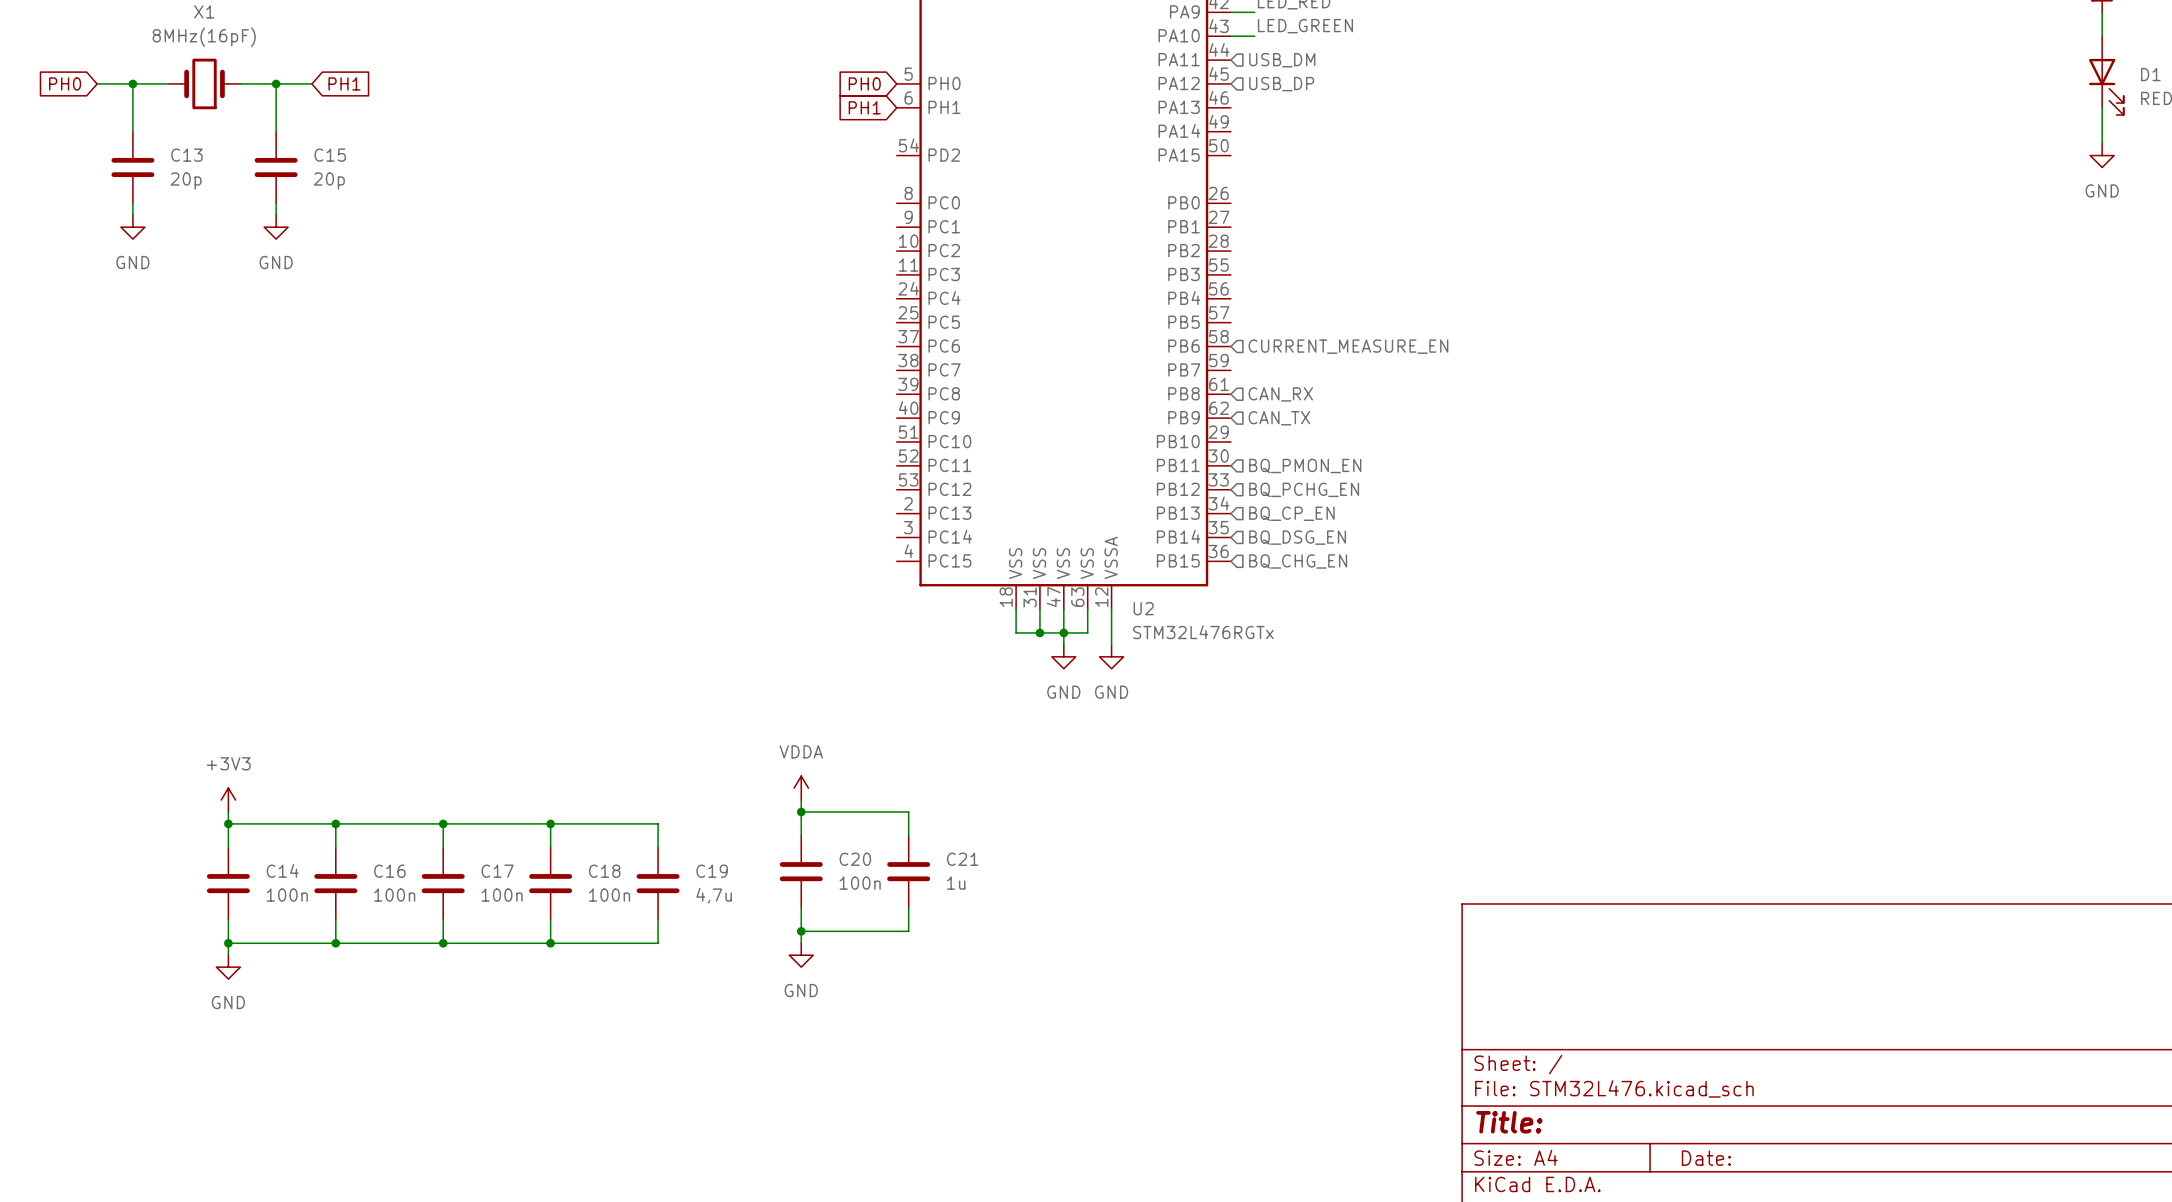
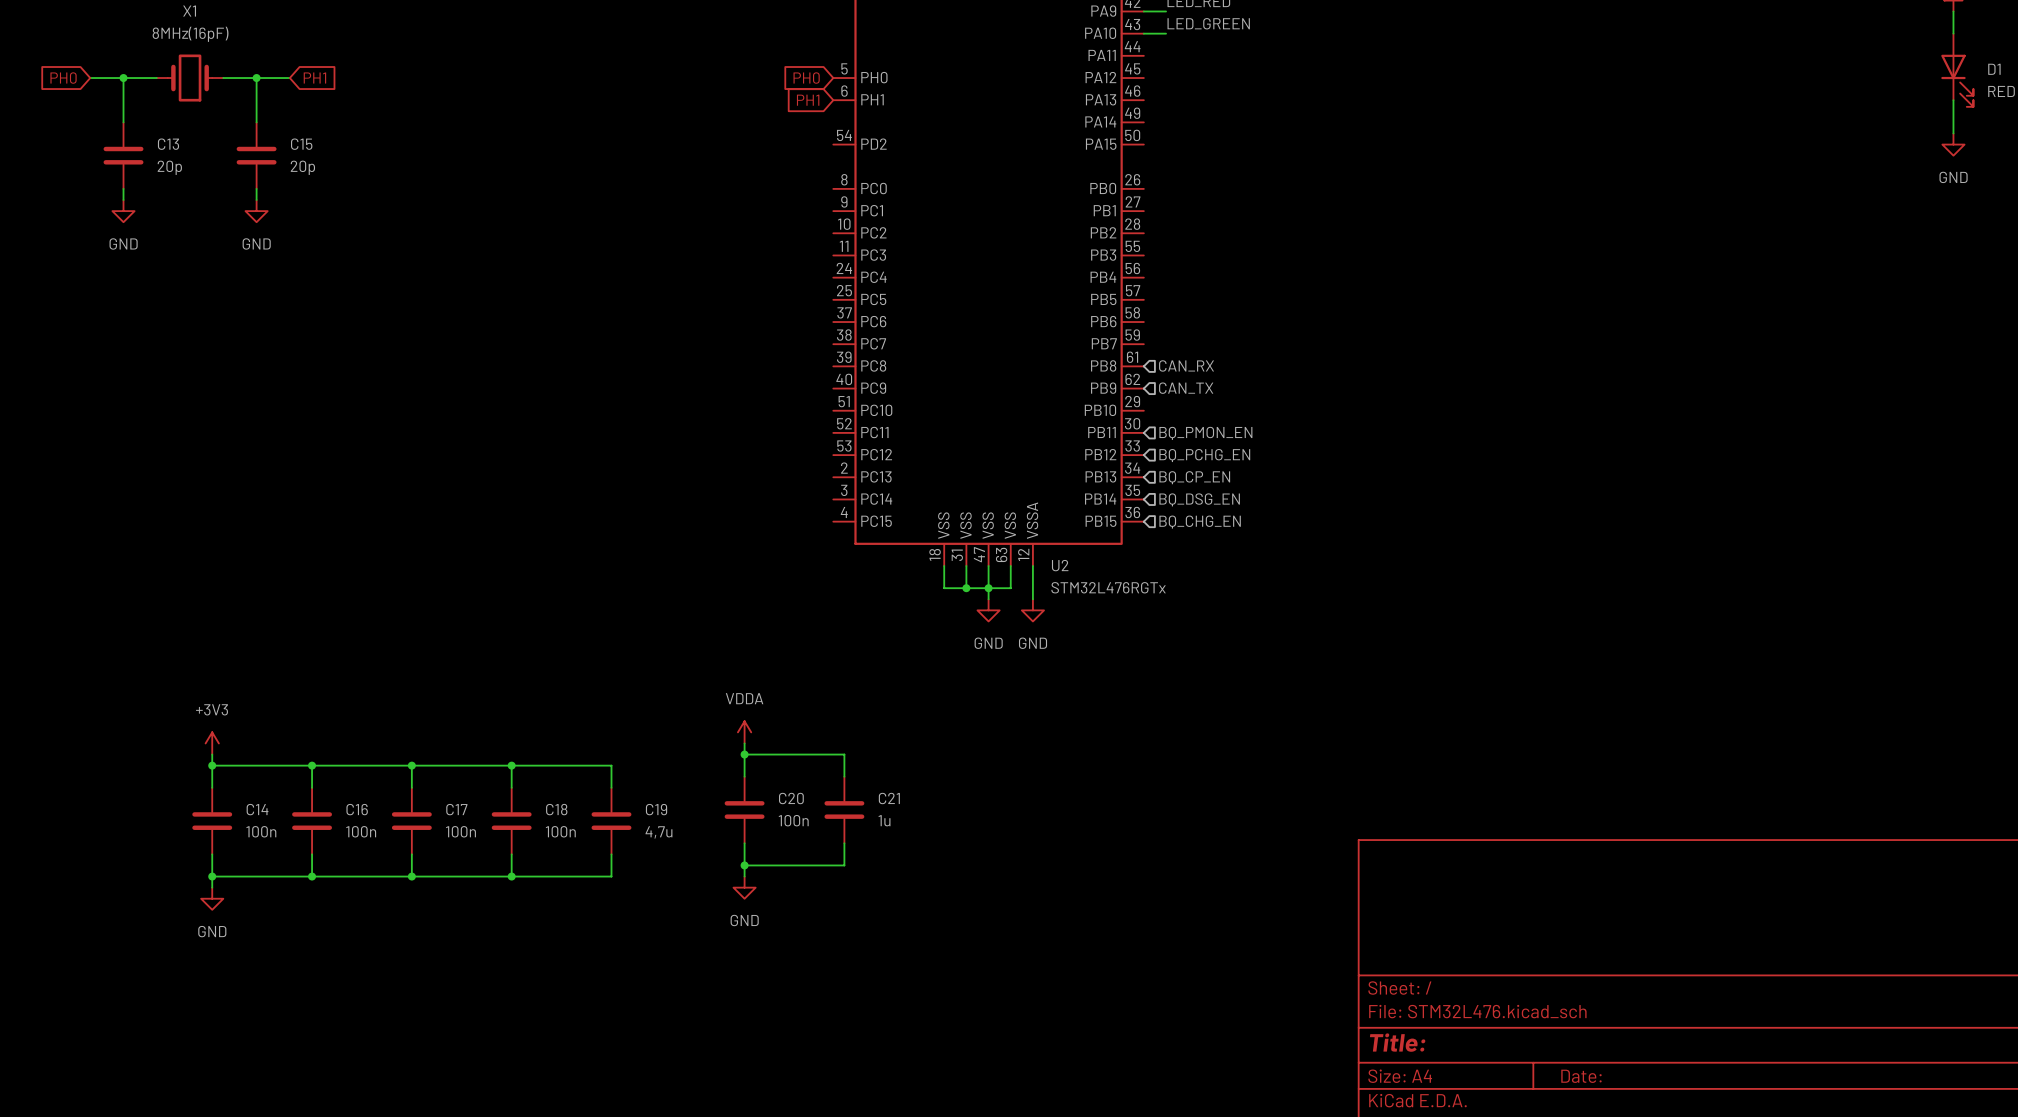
hierarchical label: USB_DM (1282, 60) -> none
hierarchical label: USB_DP (1281, 84) -> none
hierarchical label: CURRENT_MEASURE_EN (1348, 346) -> none

